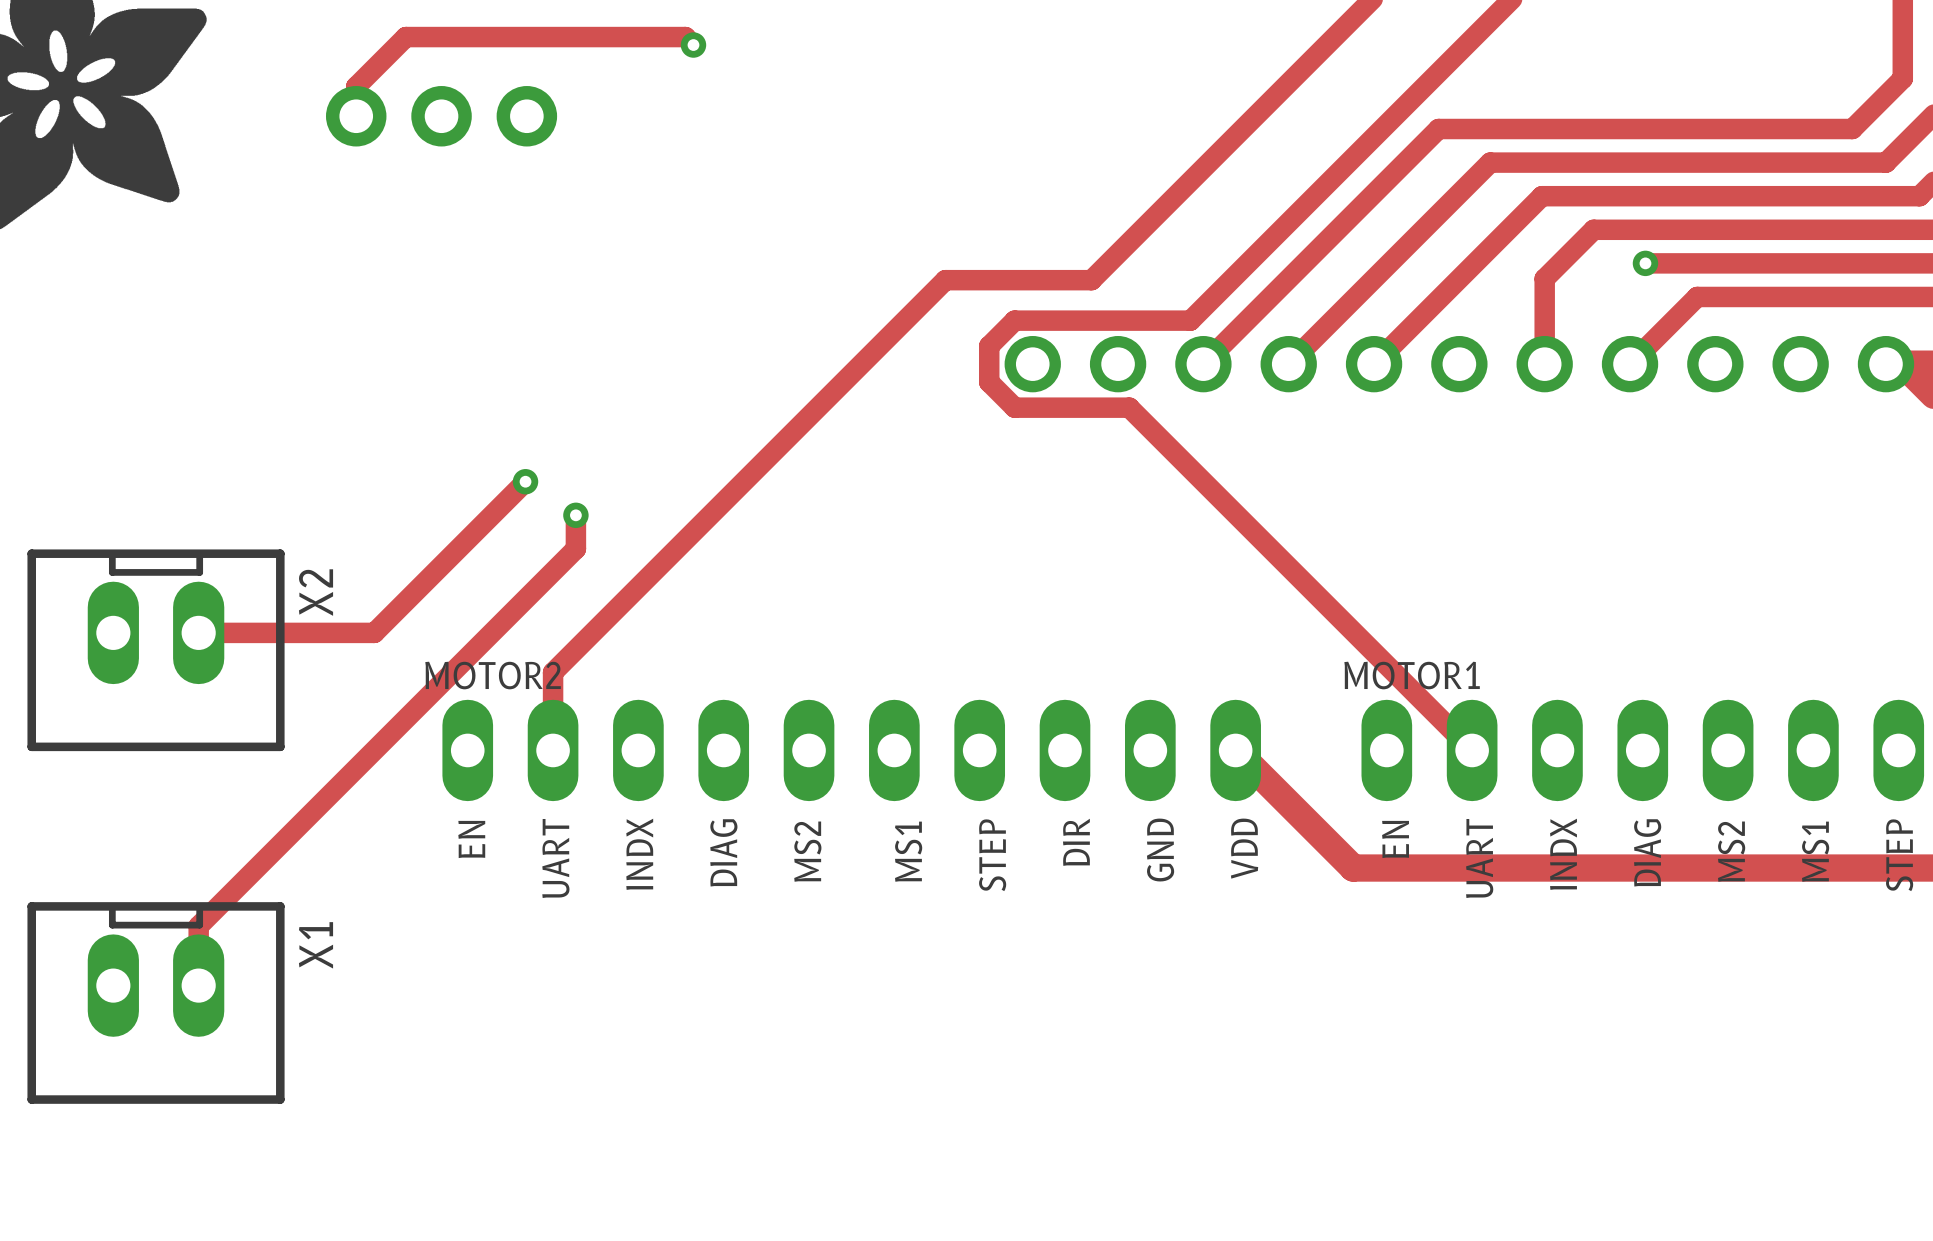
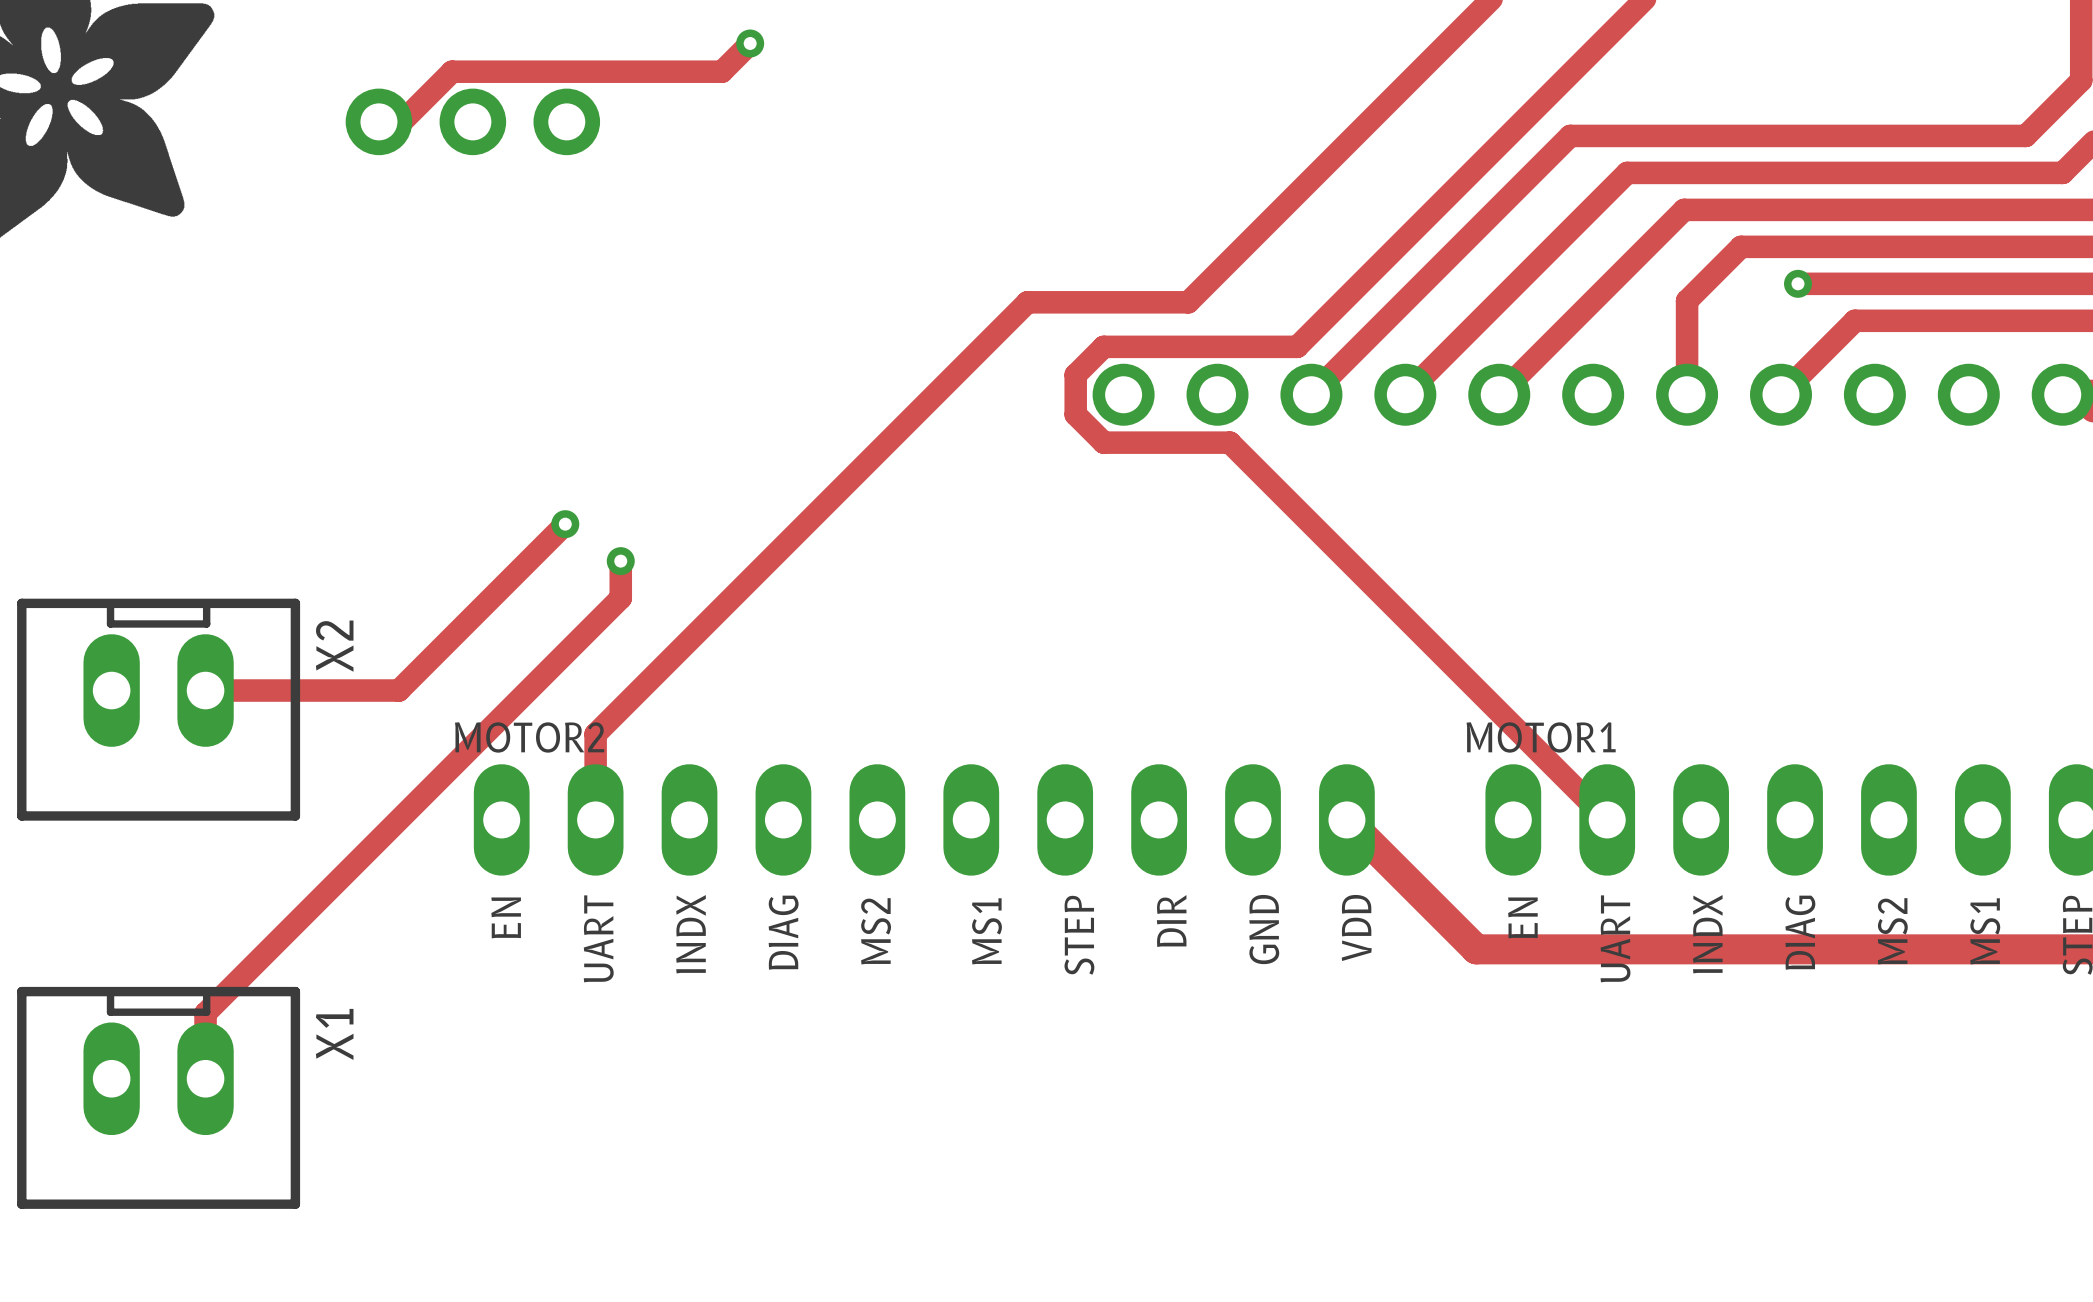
track: (693, 45) (685, 37) (405, 37) (356, 86) (356, 116) -> (750, 43) (721, 71) (452, 71) (401, 121) (378, 121)

